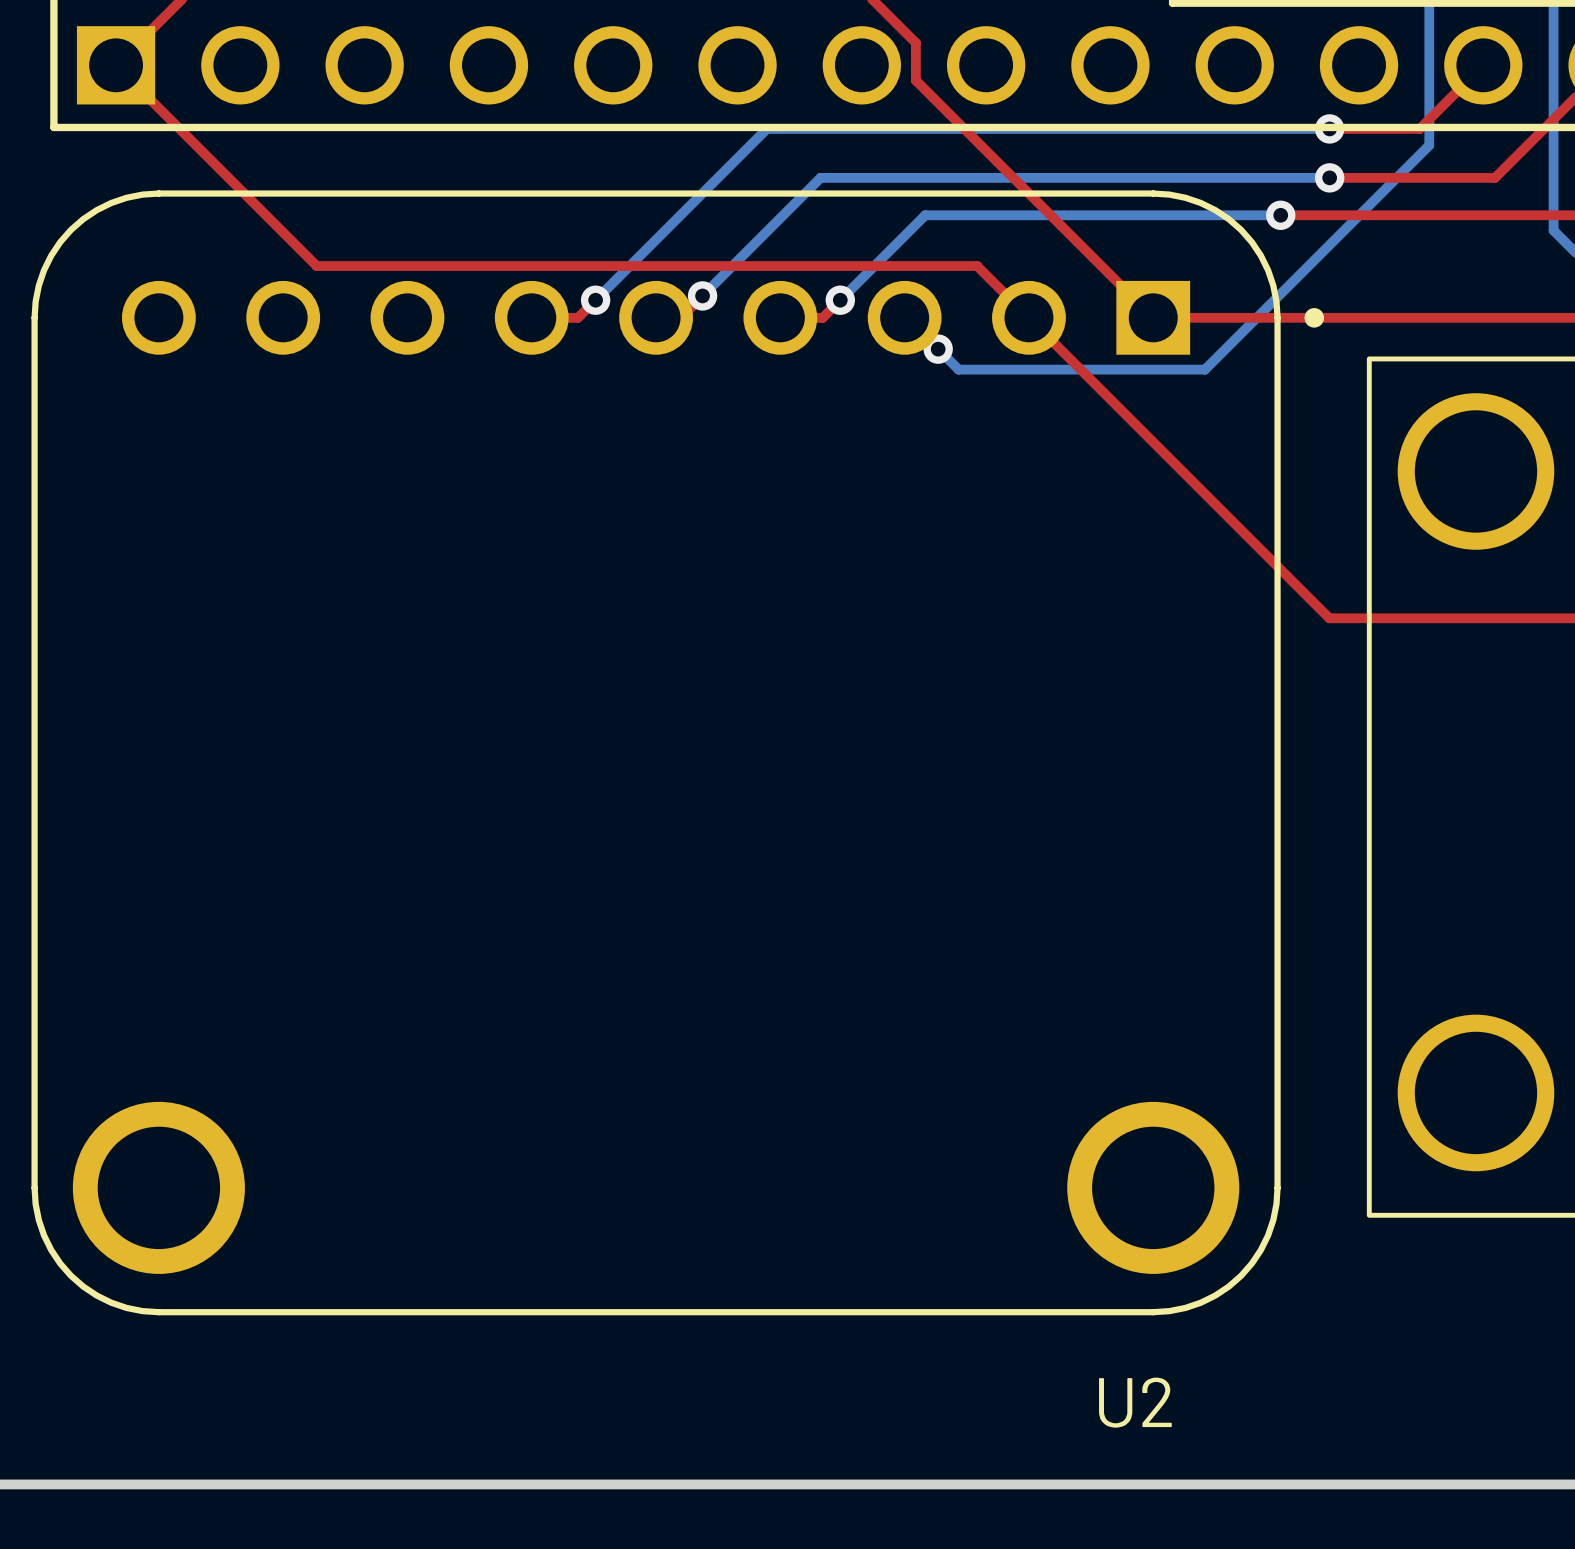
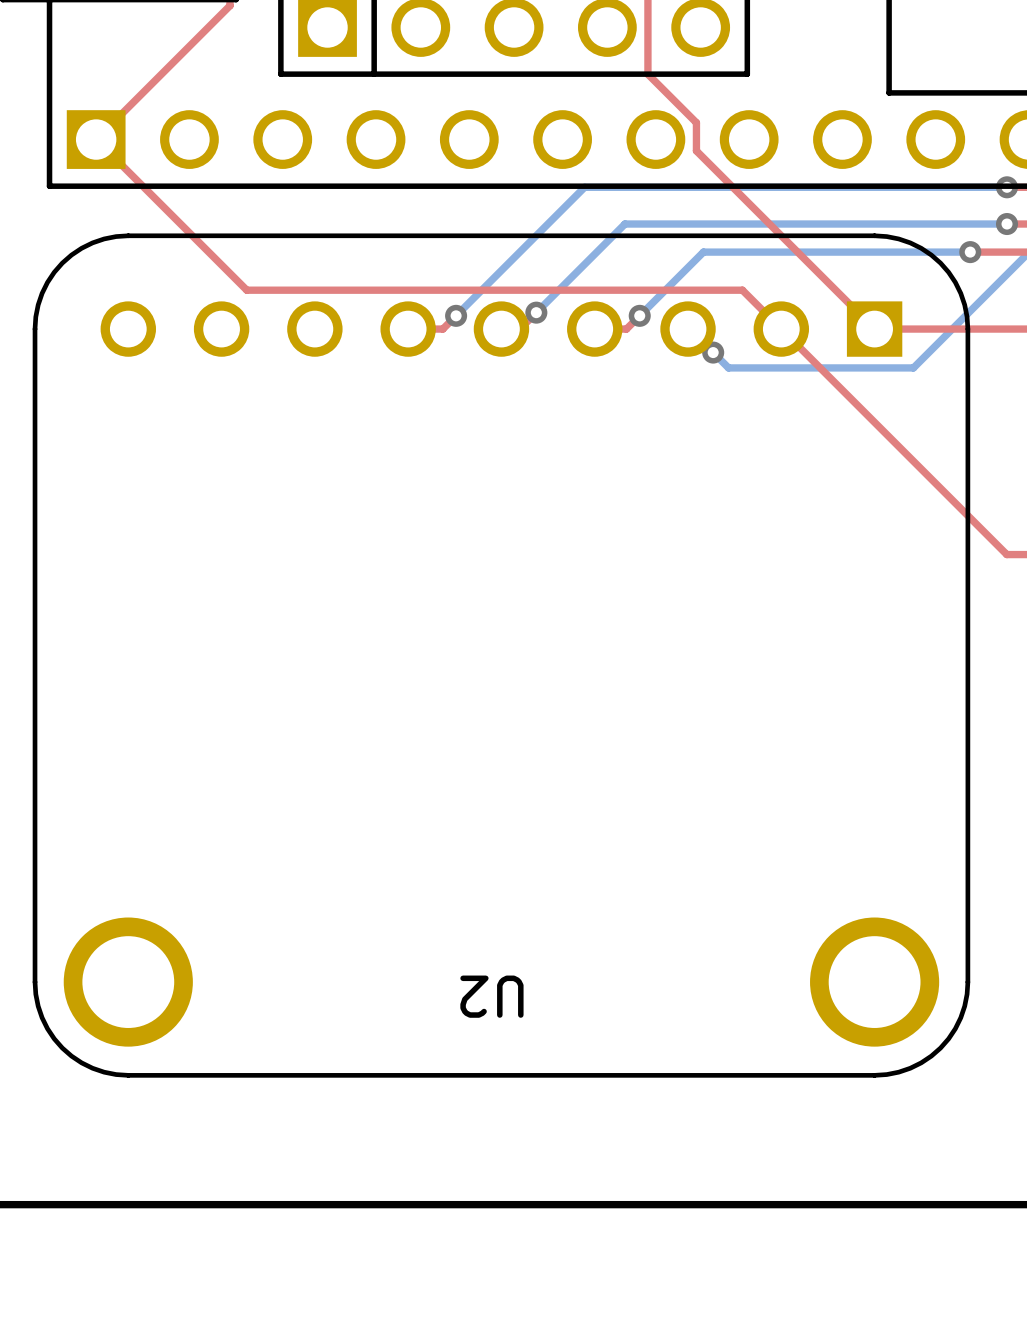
U2 footprint: [31, 190, 1325, 1316] -> [32, 233, 971, 1078]
U2 name rotation: 0° (1135, 1402) -> 180° (491, 996)
U2 name position: U2 (1135, 1402) -> U2 (491, 996)

